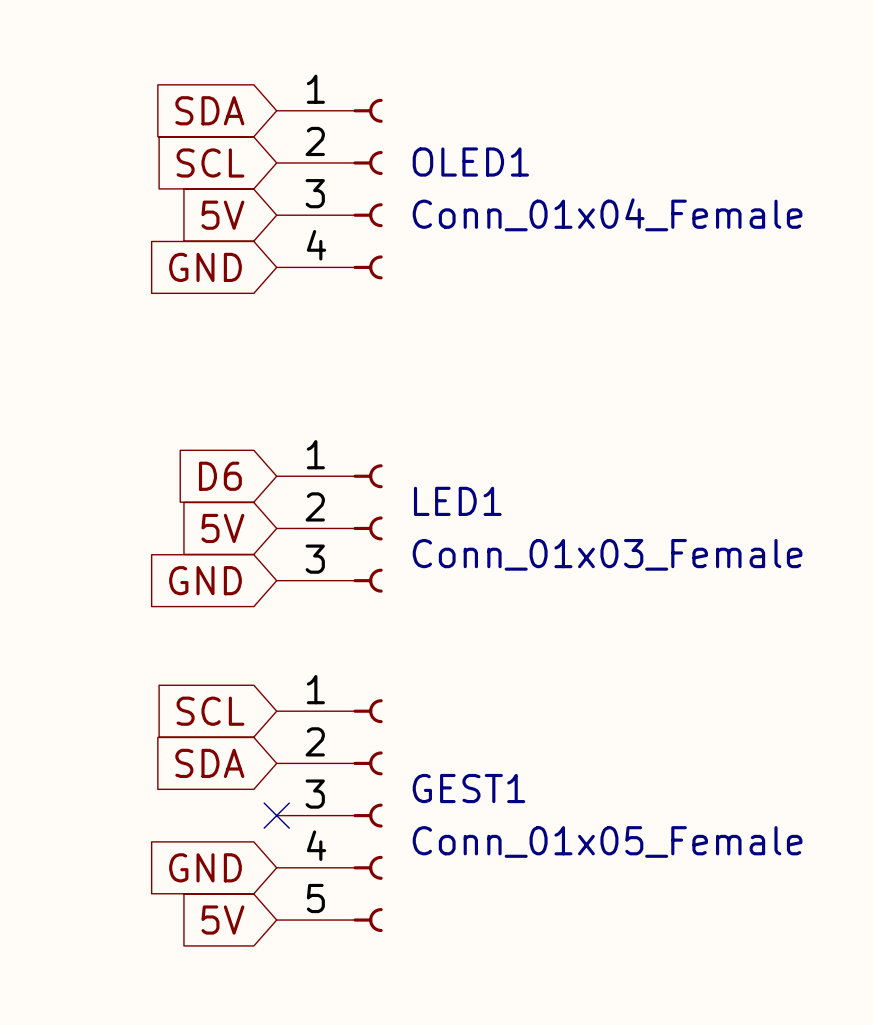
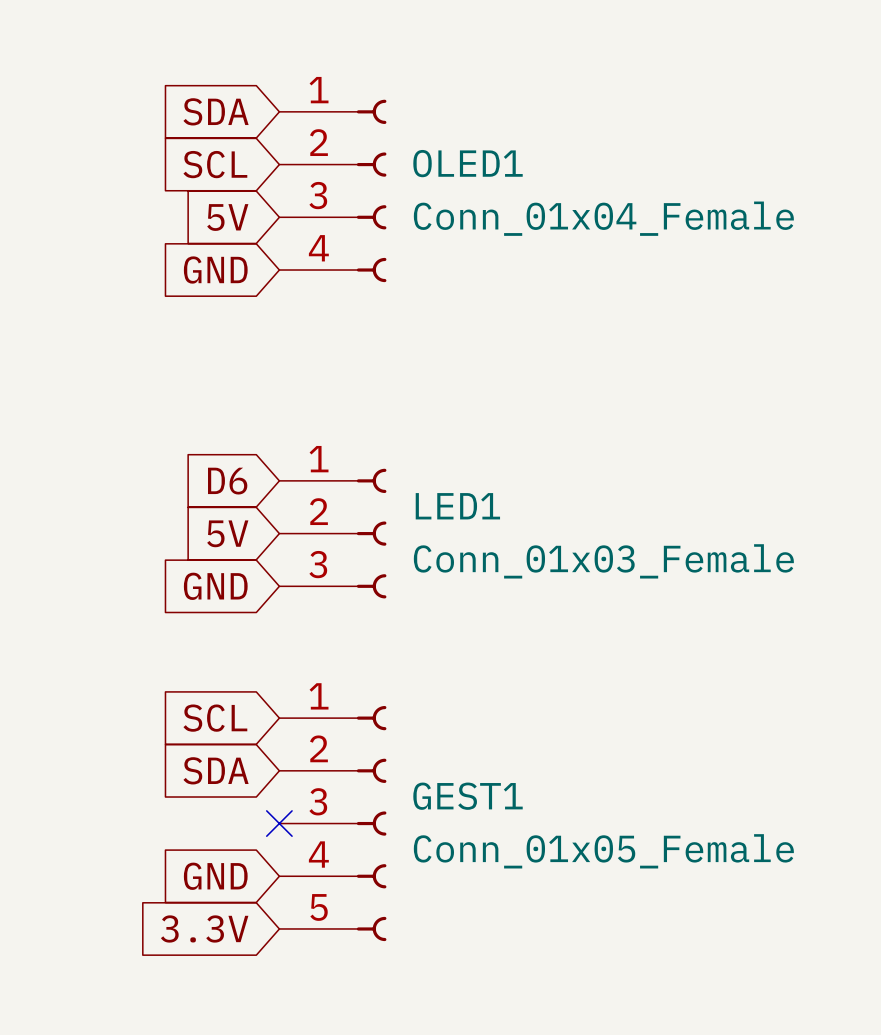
global label: 5V (222, 920) -> 3.3V (204, 928)

